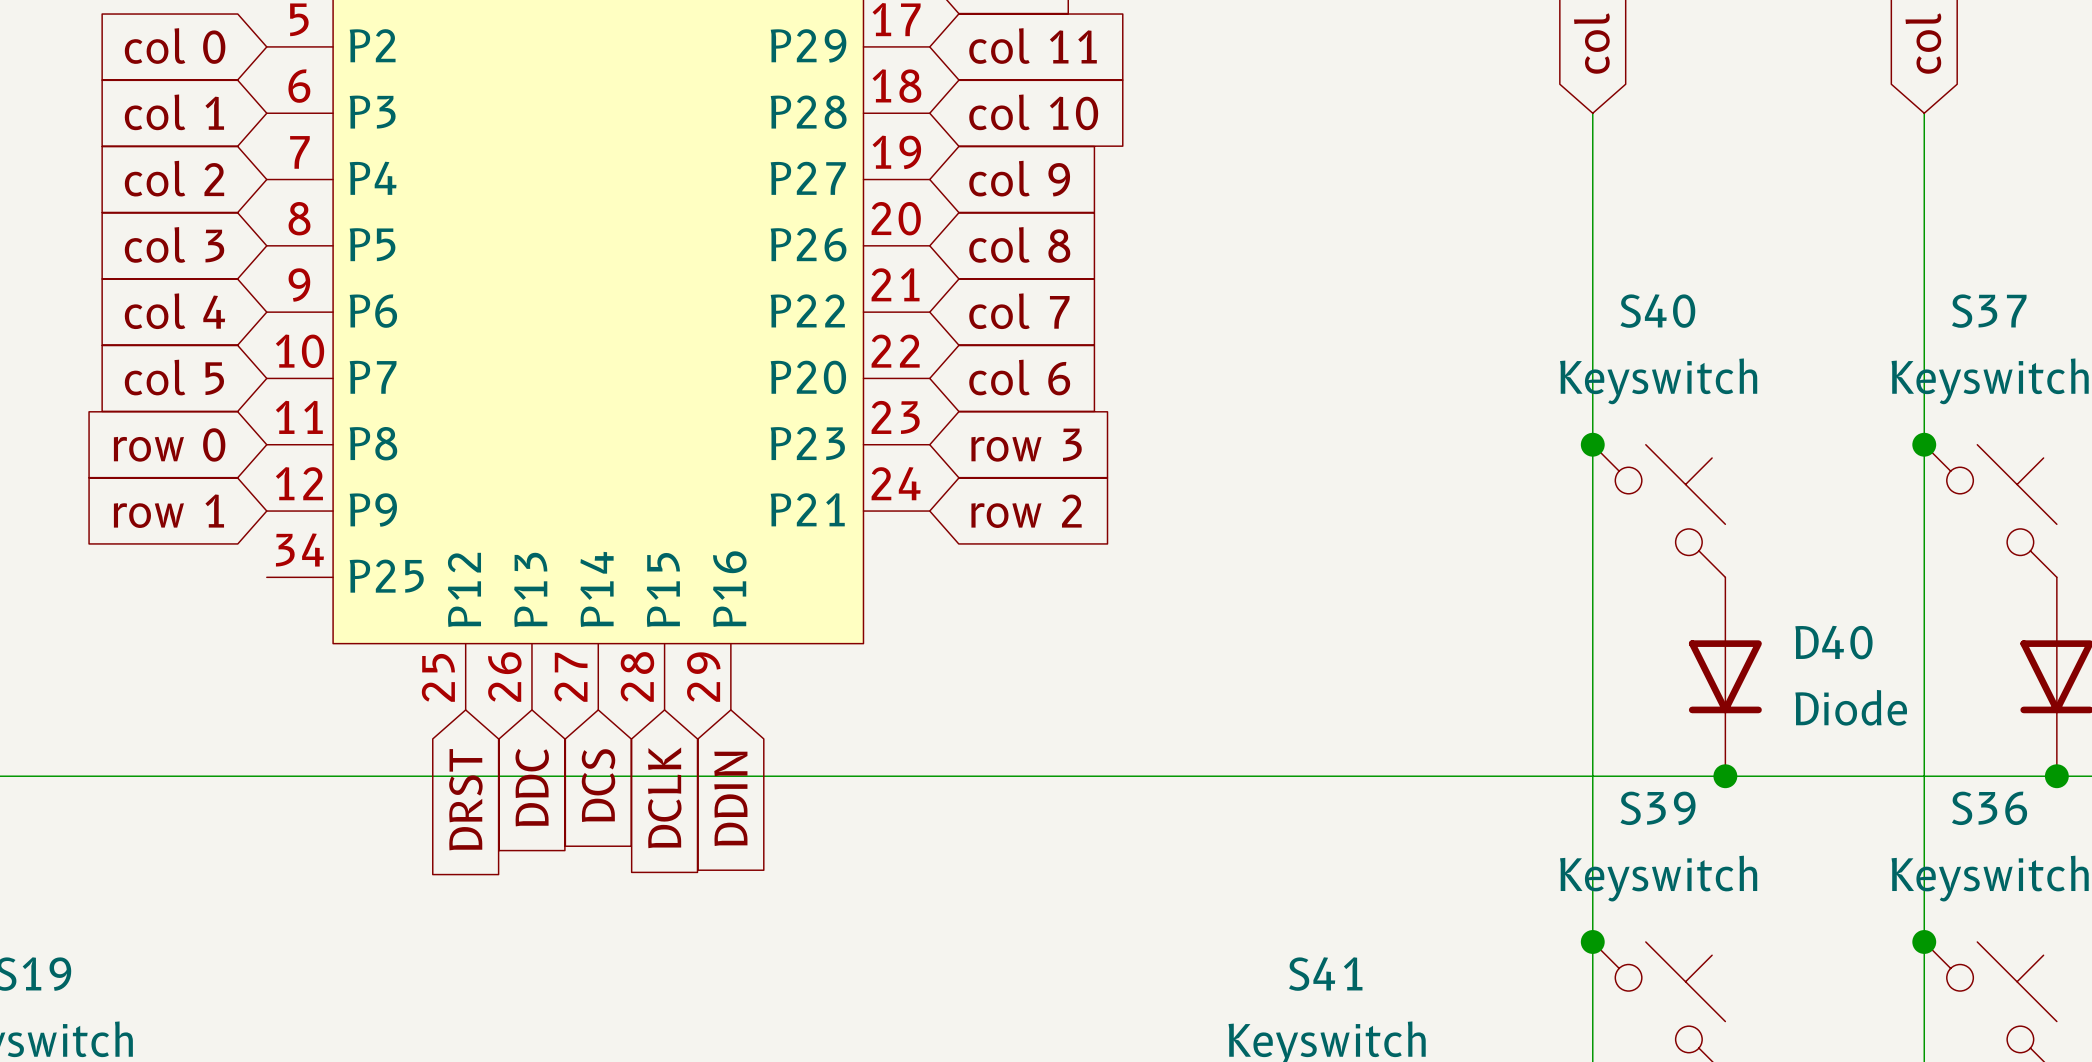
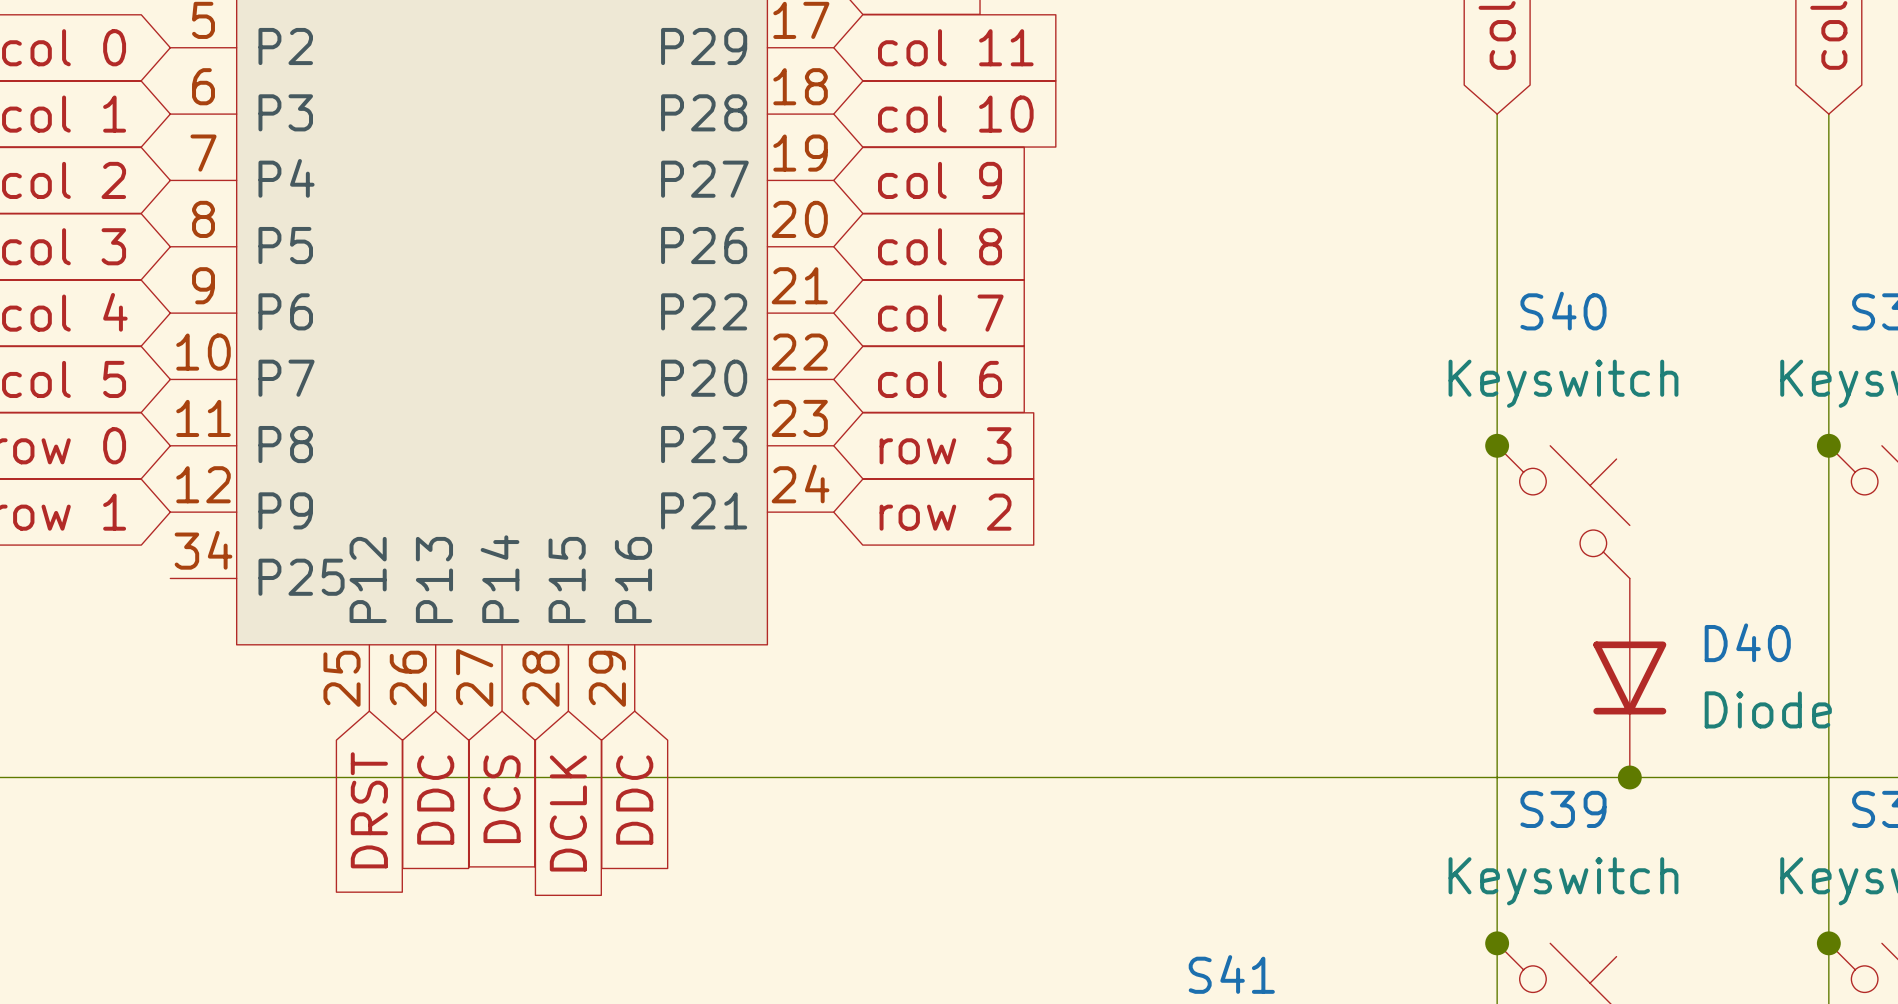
global label: DDIN (730, 798) -> DDC (634, 800)

